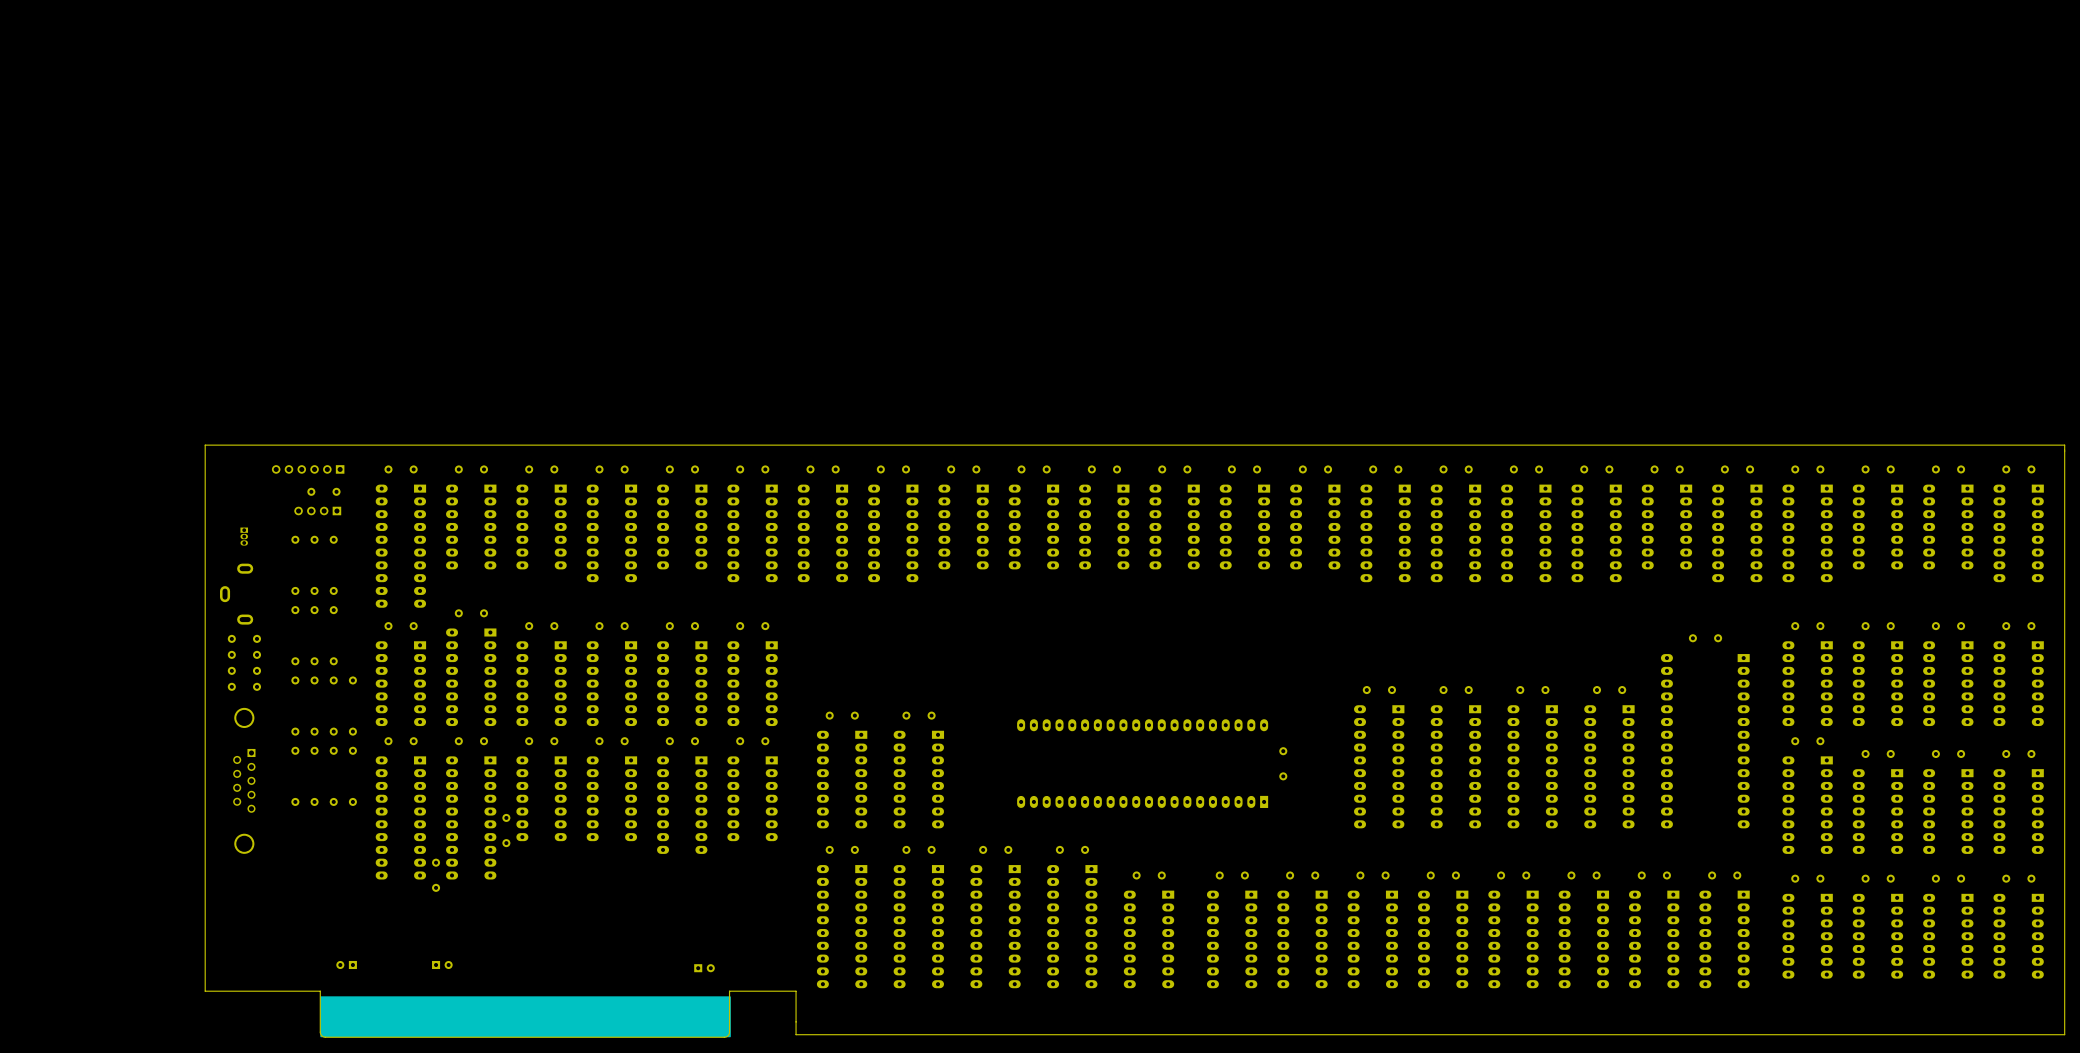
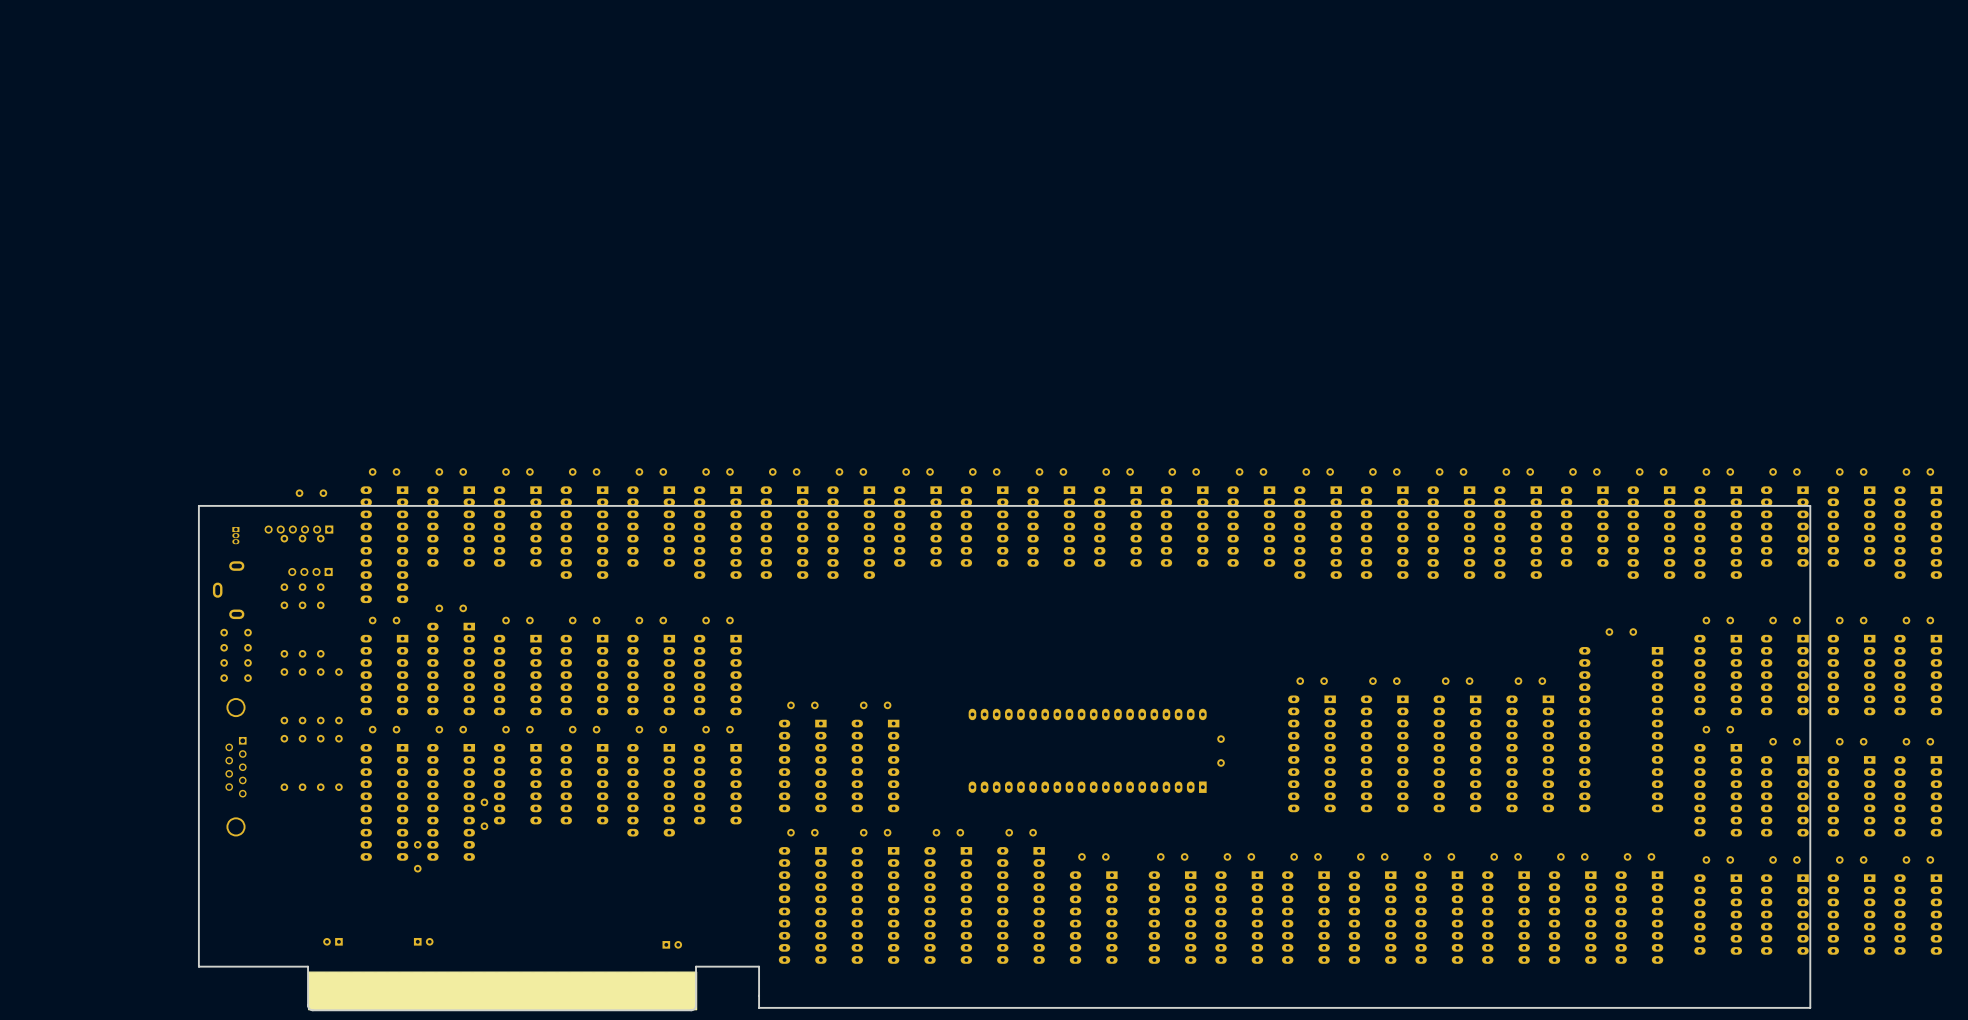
part position: (308, 469) -> (298, 529)
board edge: (205, 505) (205, 445) (2064, 445) (2064, 1034) (1904, 1034) -> (198, 505) (1810, 505) (1810, 1007)
part position: (317, 511) -> (310, 571)

